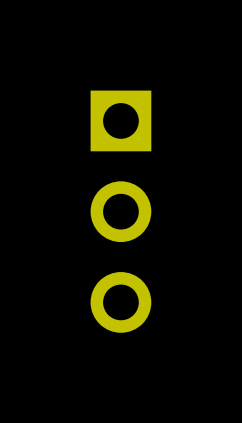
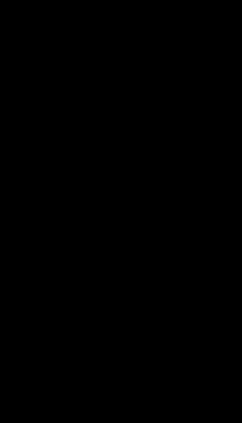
part: (120, 211) -> none

